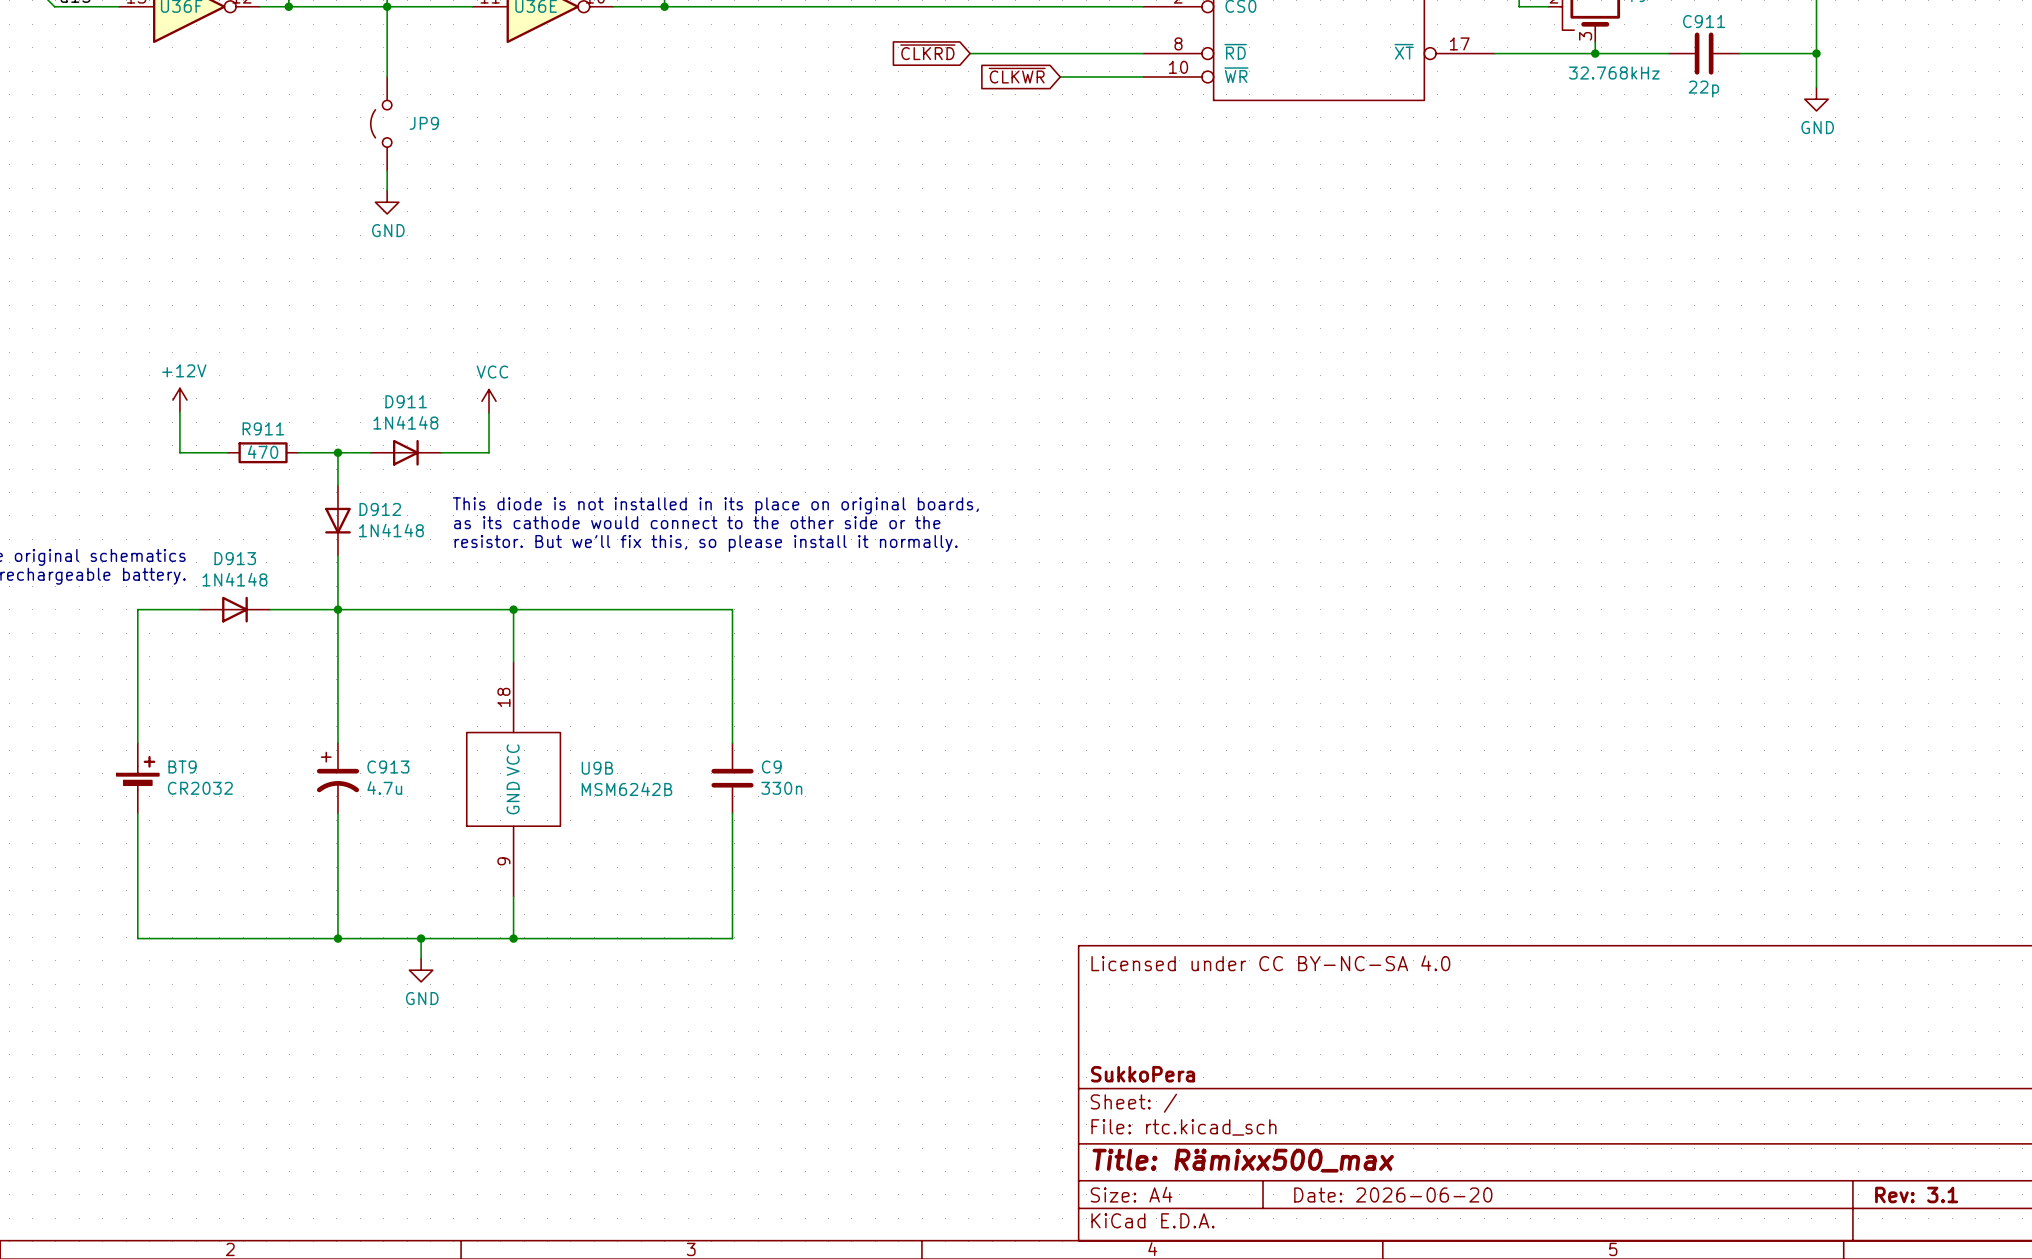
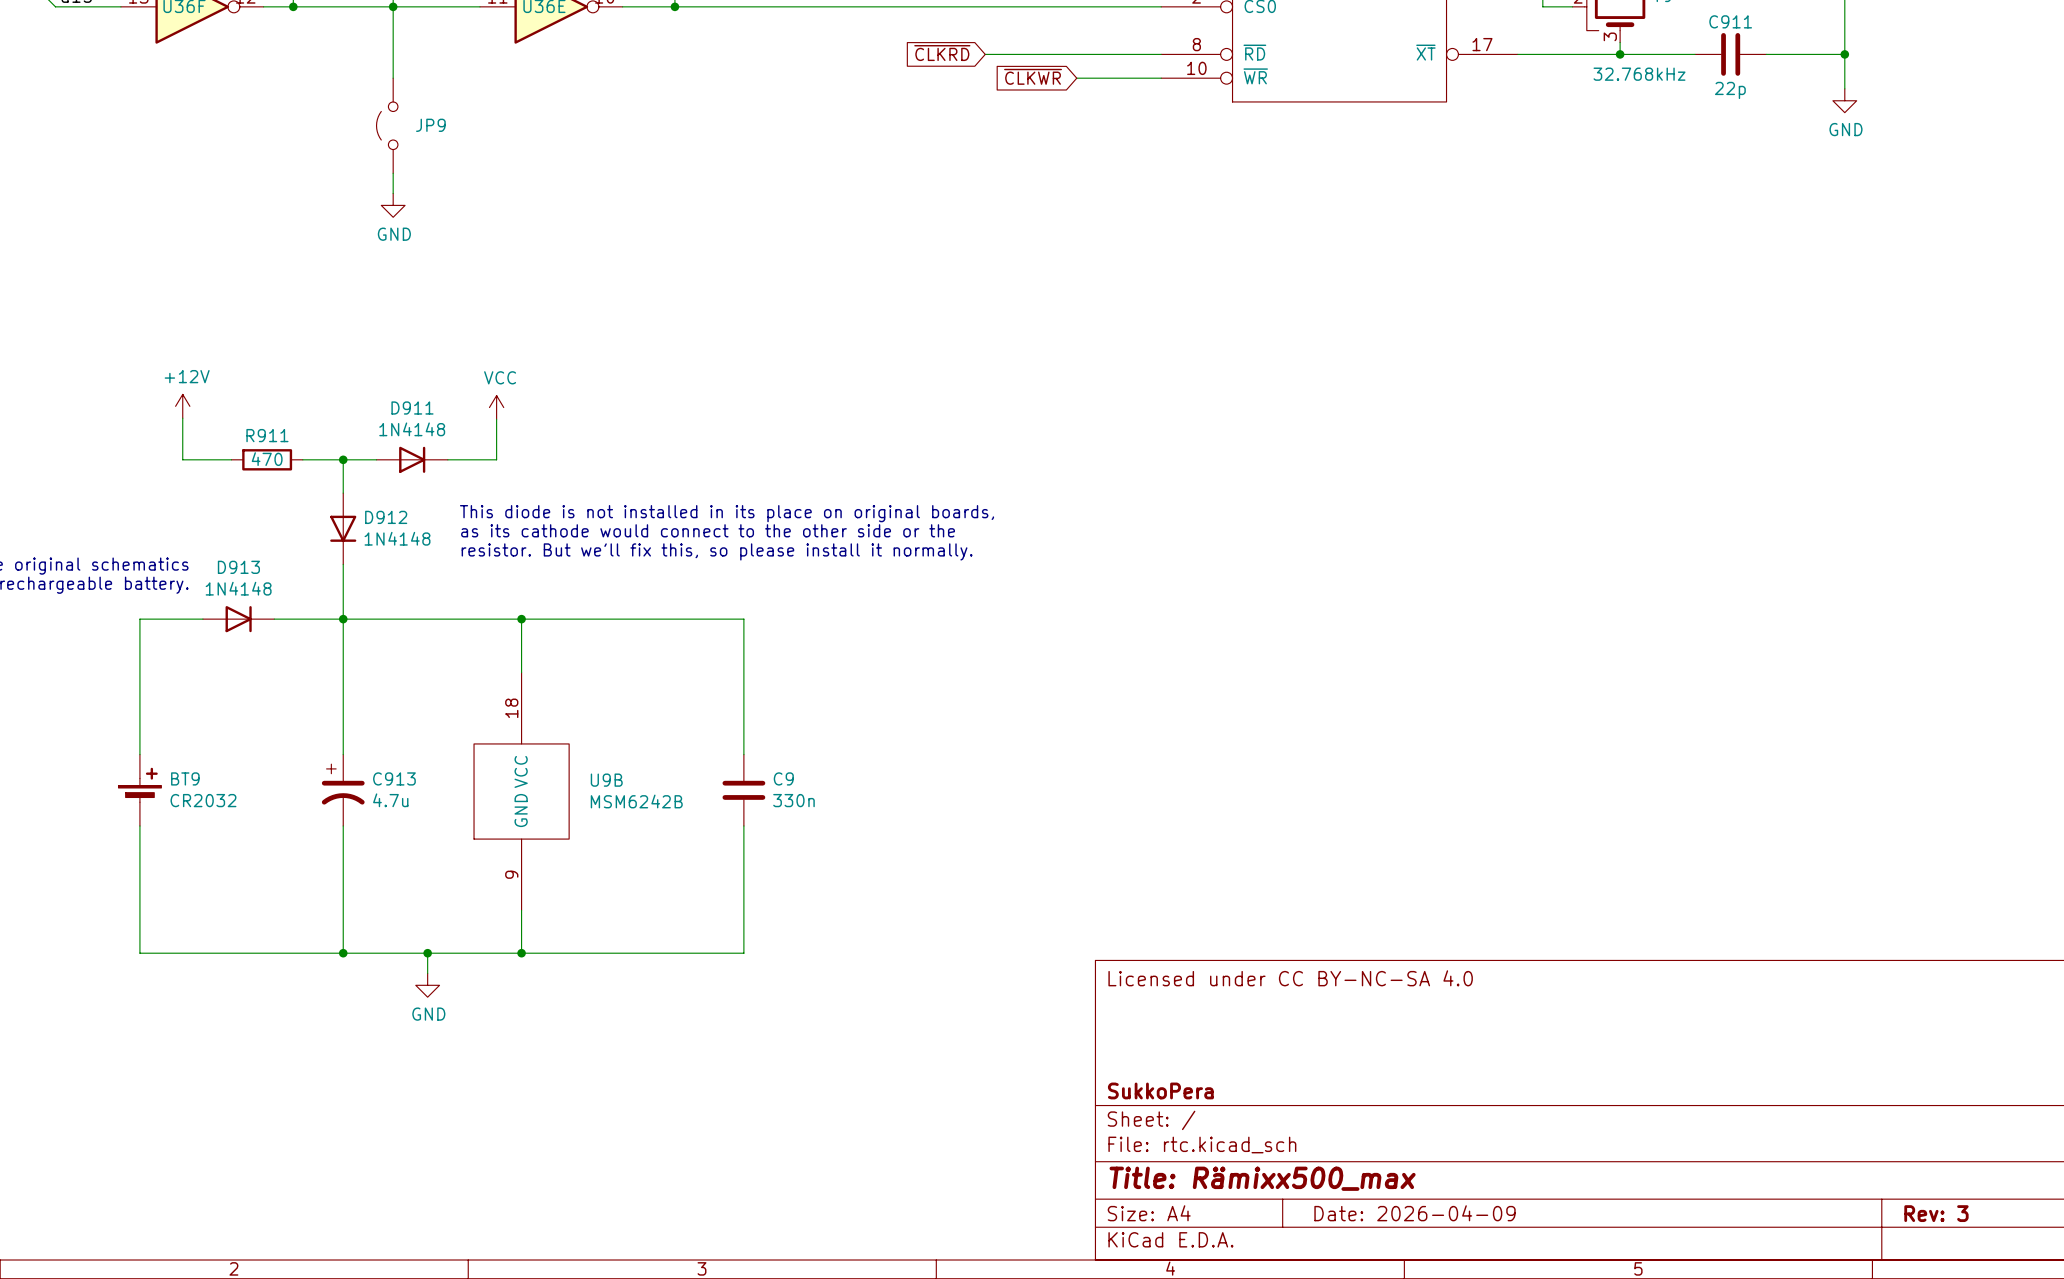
title block: Date: 2026-06-20 (1393, 1194) -> Date: 2026-04-09 (1415, 1213)
title block: Rev: 3.1 (1916, 1194) -> Rev: 3 (1936, 1213)

